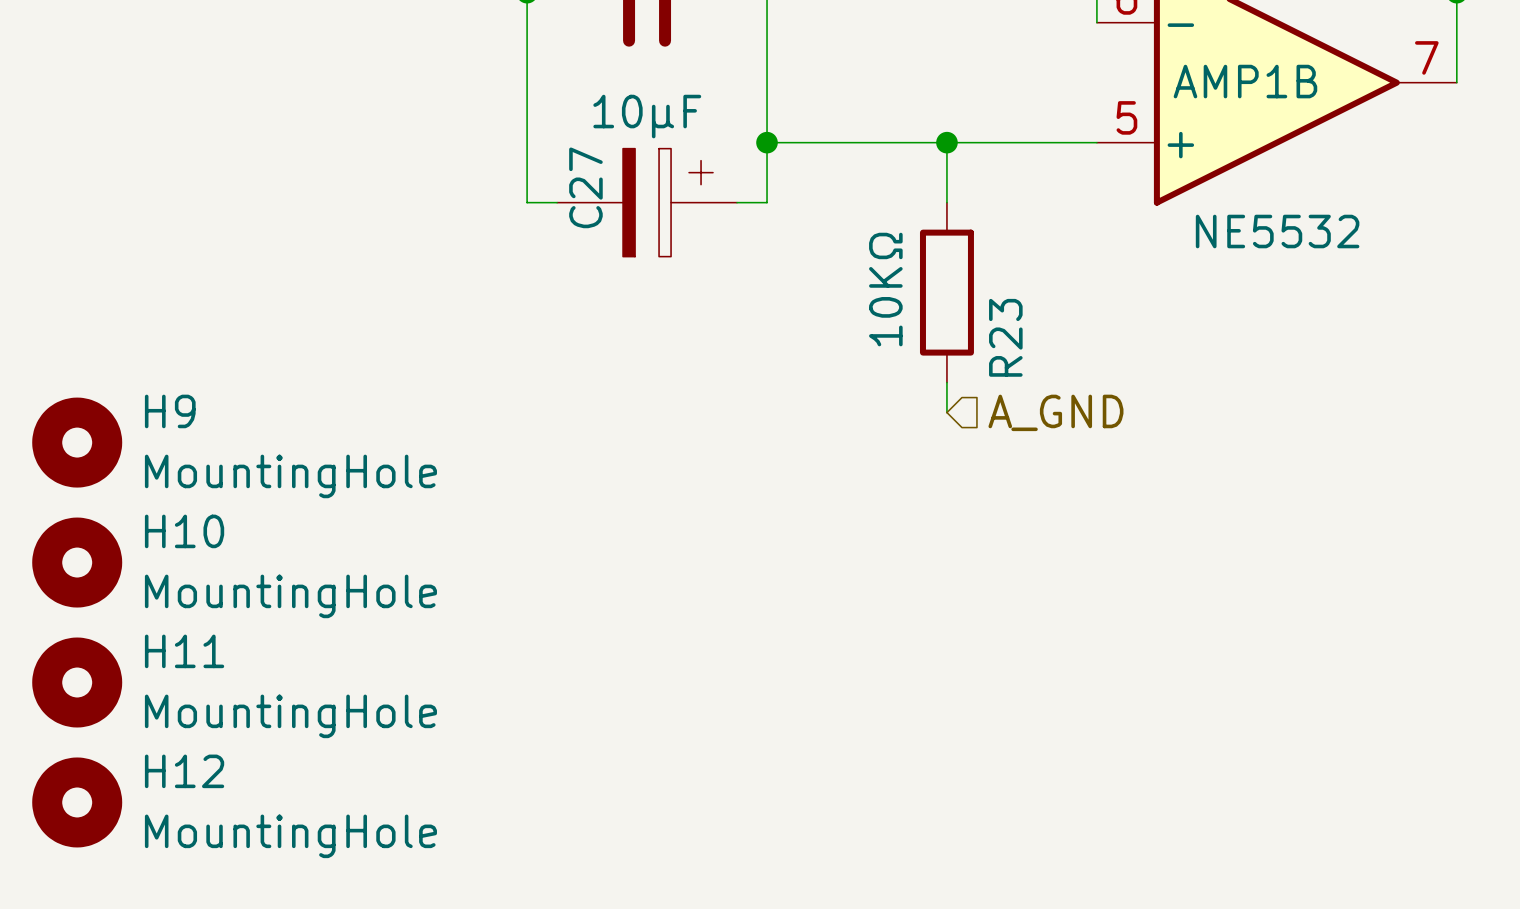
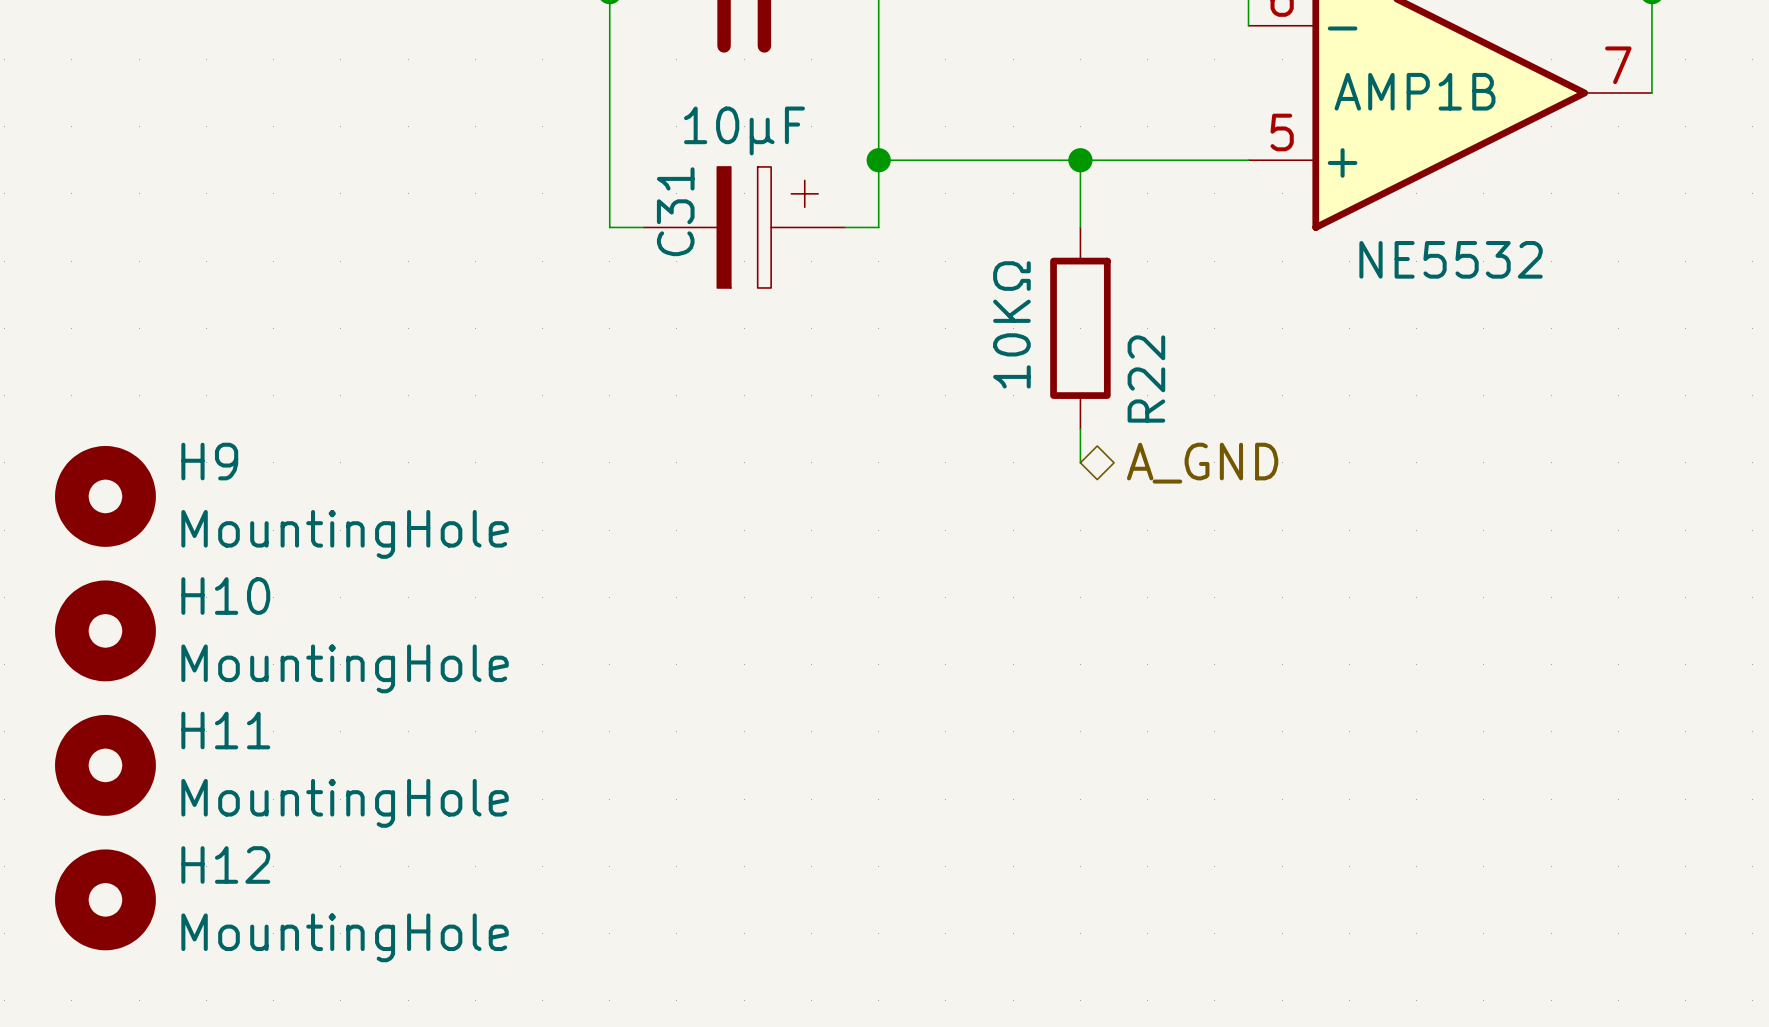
C27 name: C27 (585, 187) -> C31 (675, 211)
R23 name: R23 (1005, 337) -> R22 (1146, 379)
hierarchical label shape: input (1055, 412) -> bidirectional (1202, 463)

